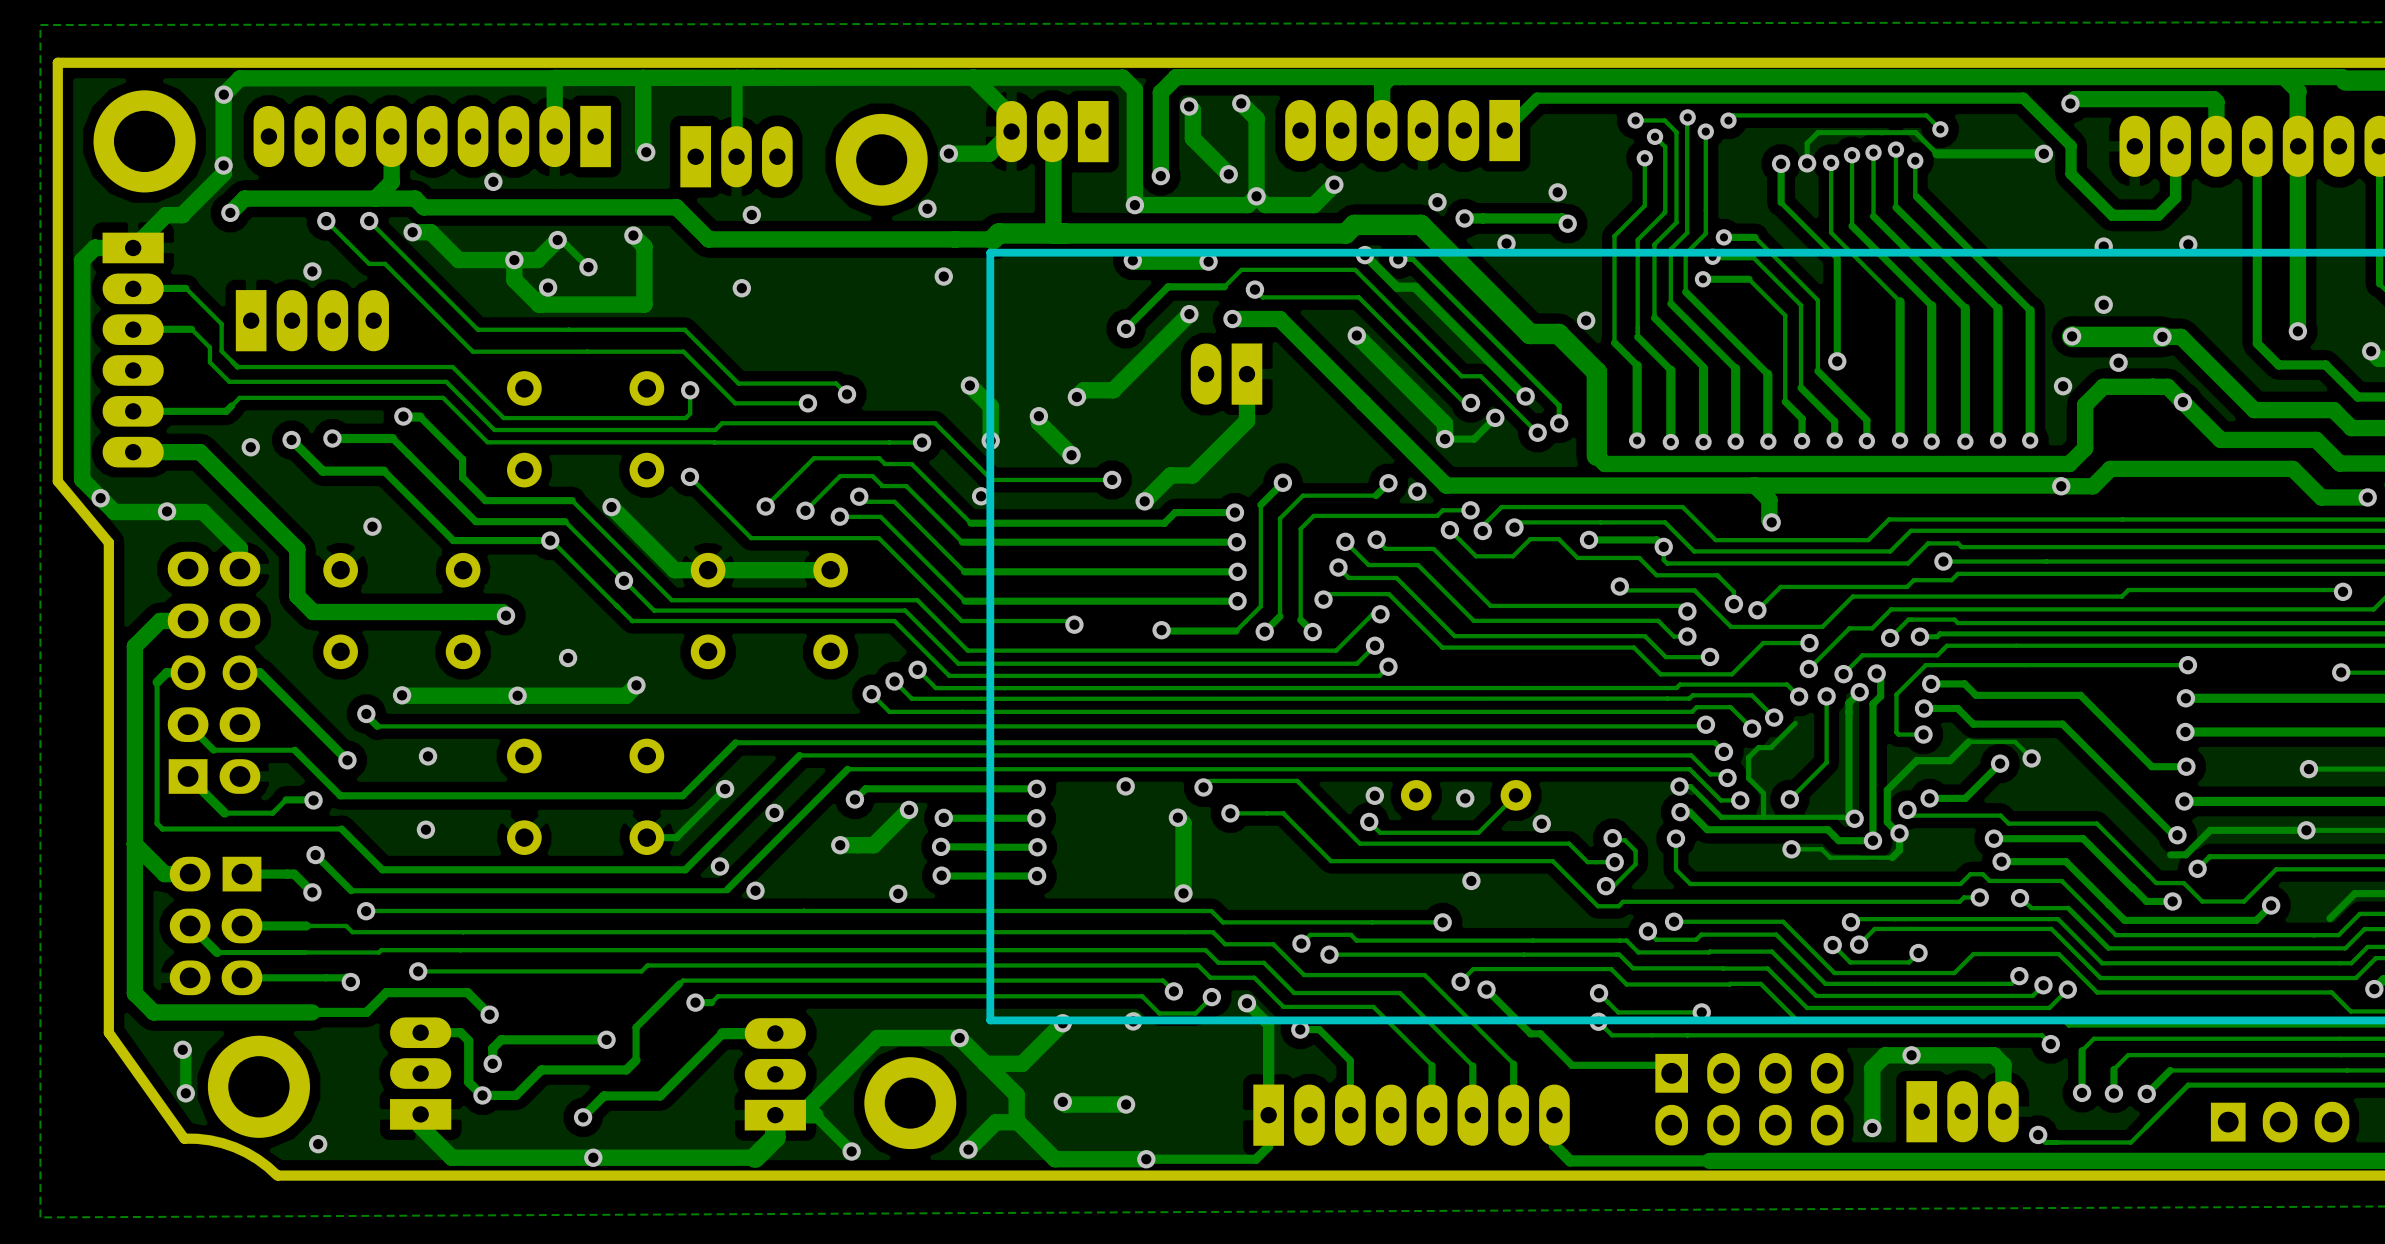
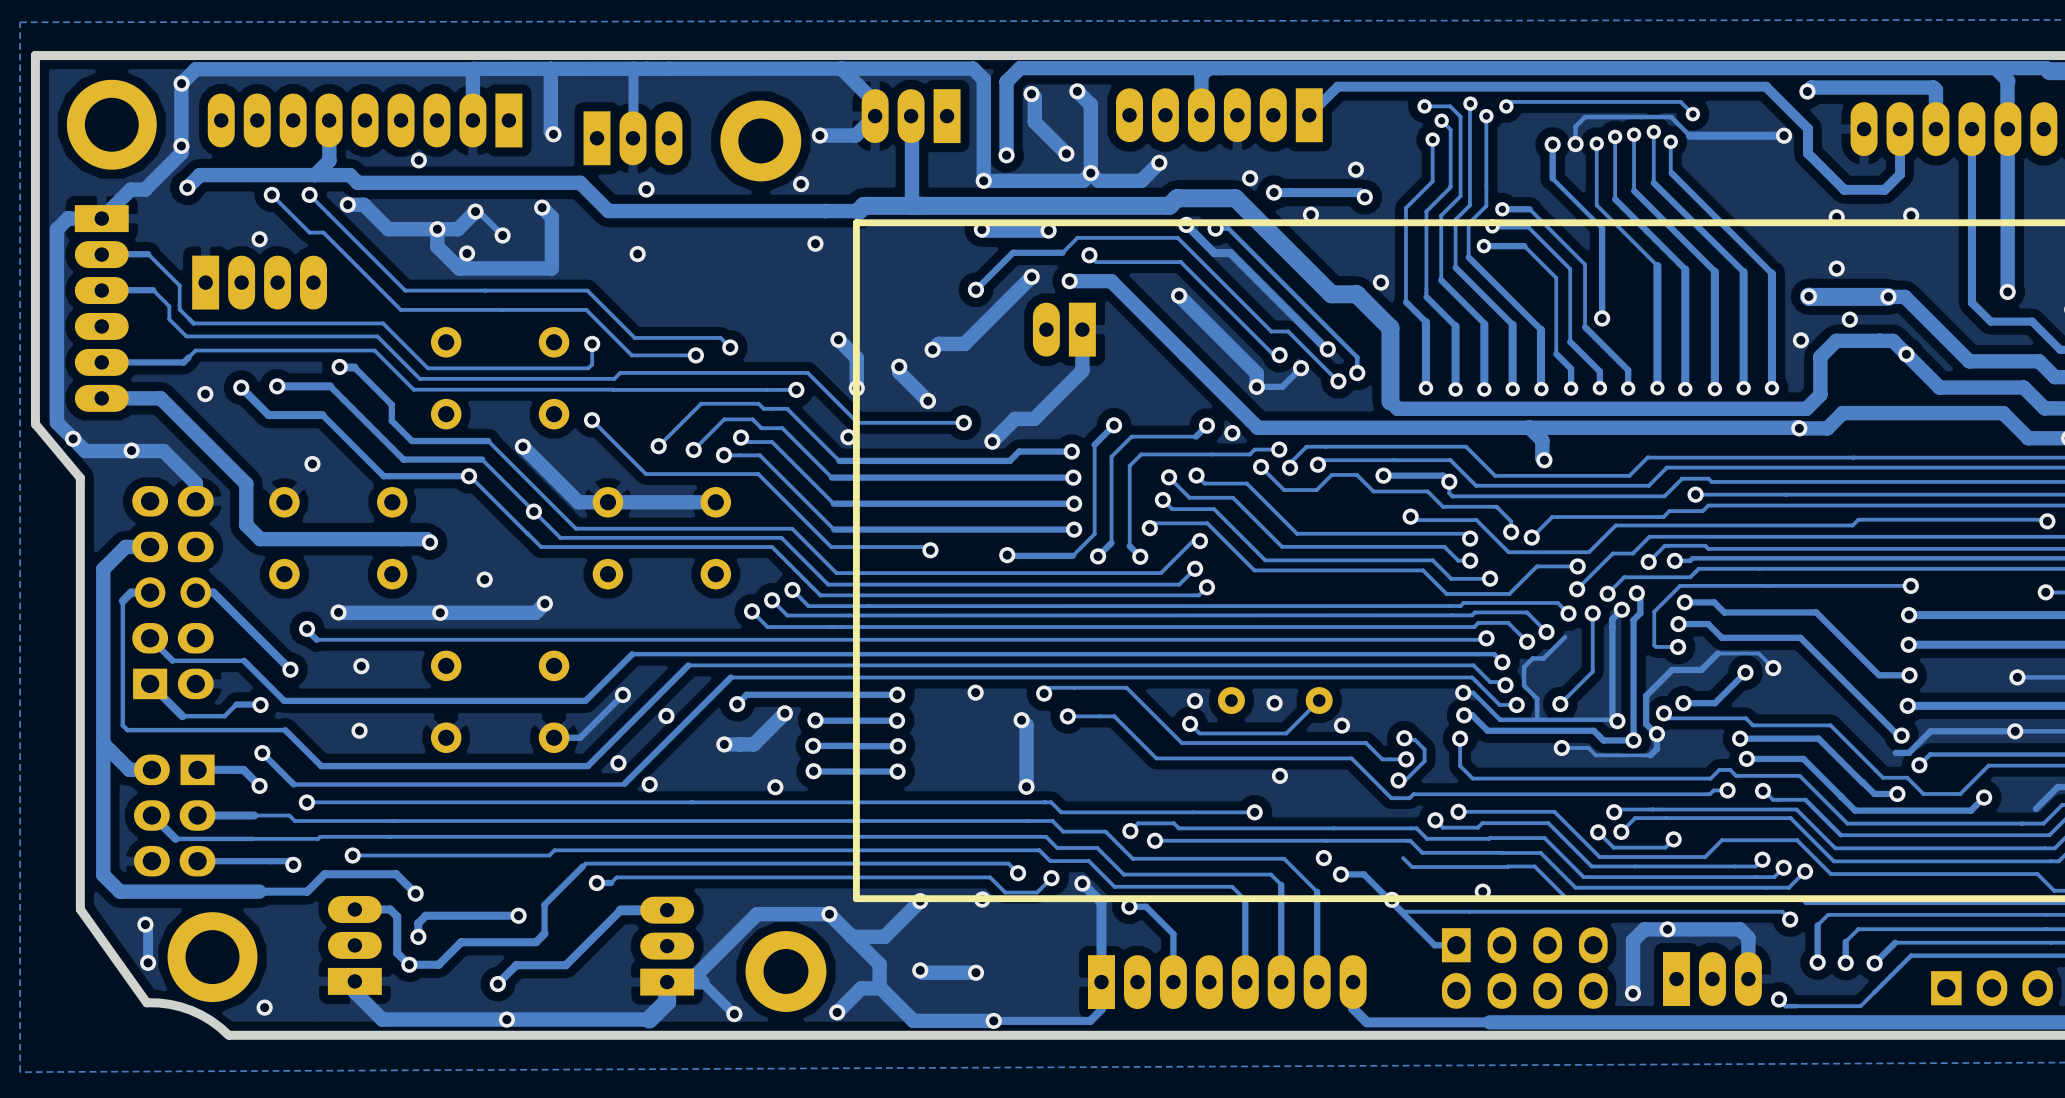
via: none -> (1323, 858)
track: (1424, 975) (1513, 1063) -> (1238, 858) (1284, 858) (1317, 891) (1317, 937)
track: (1460, 981) (1473, 969) (1611, 969) (1626, 984) -> (1403, 858) (1412, 867) (1416, 867)
via: (1460, 981) -> none
track: (1486, 989) (1530, 1033) (1540, 1033) (1572, 1065) (1663, 1065) (1671, 1073) -> (1340, 874) (1363, 874) (1434, 945) (1456, 945)
via: (1486, 989) -> none
via: none -> (1340, 874)
track: (1399, 993) (1472, 1065) -> (1217, 874) (1270, 874) (1281, 884) (1281, 938)
track: (1599, 993) (1618, 1012) (1701, 1012) -> none
via: (1599, 993) -> none
track: (1373, 1006) (1432, 1065) -> (1193, 886) (1232, 886) (1245, 899) (1245, 938)

